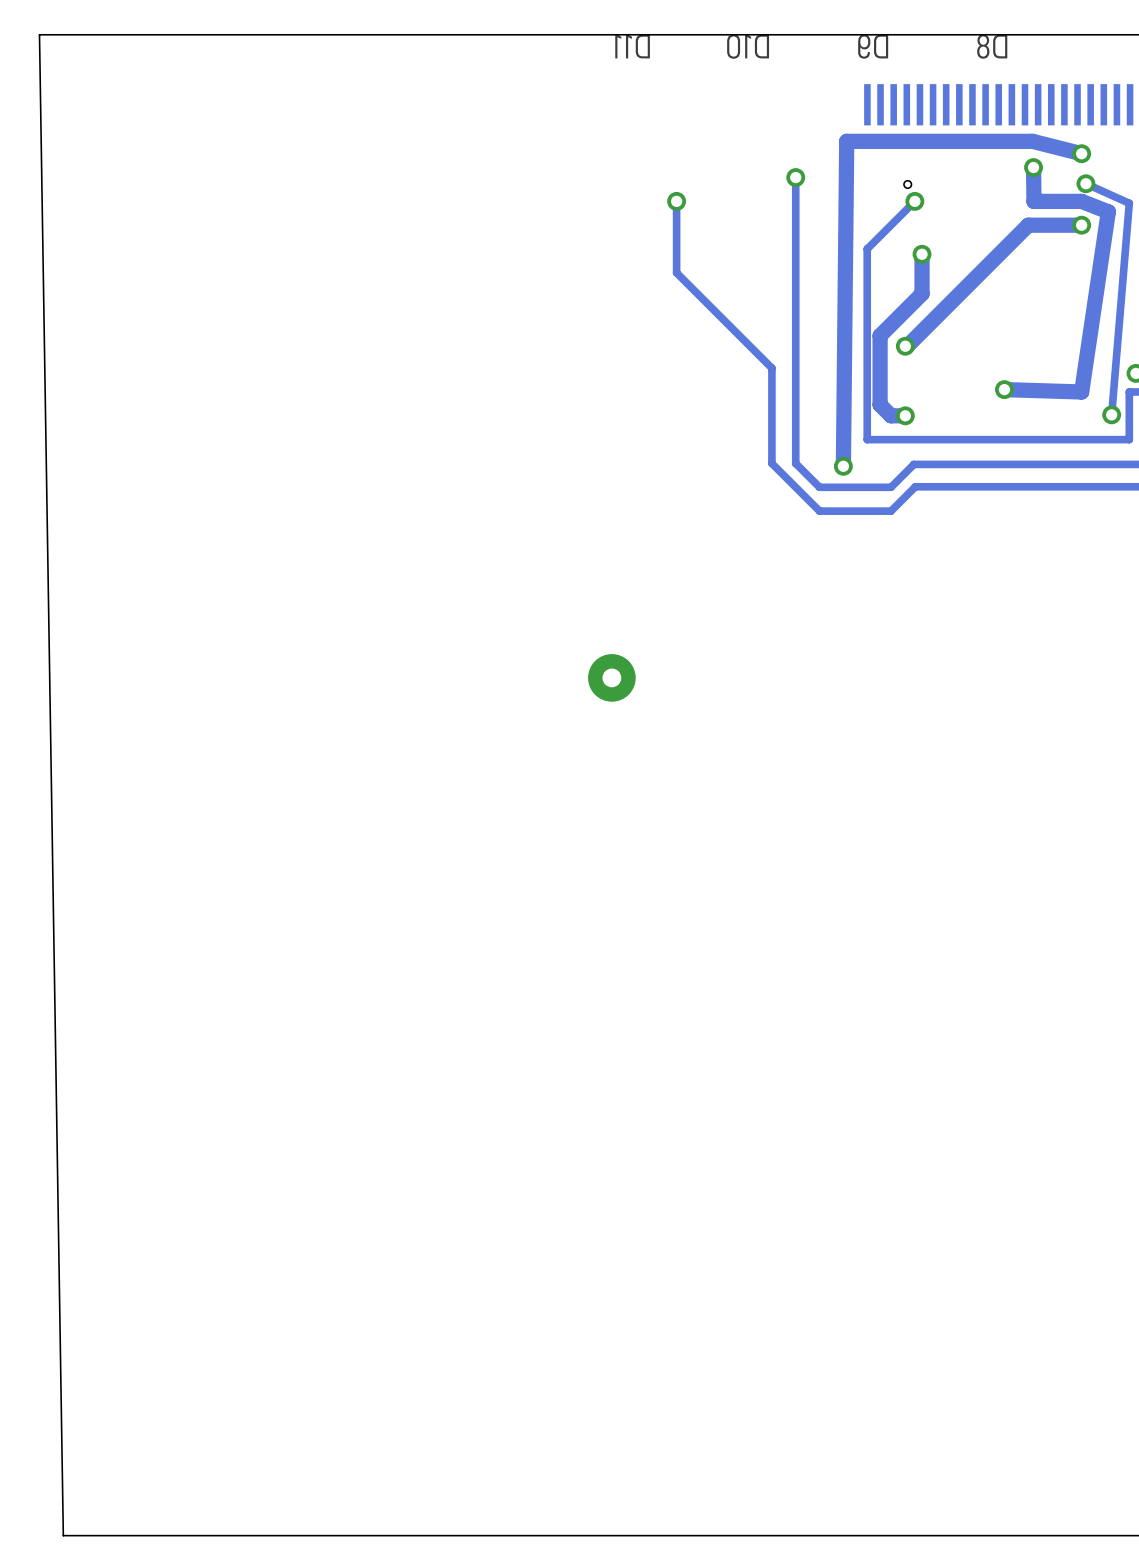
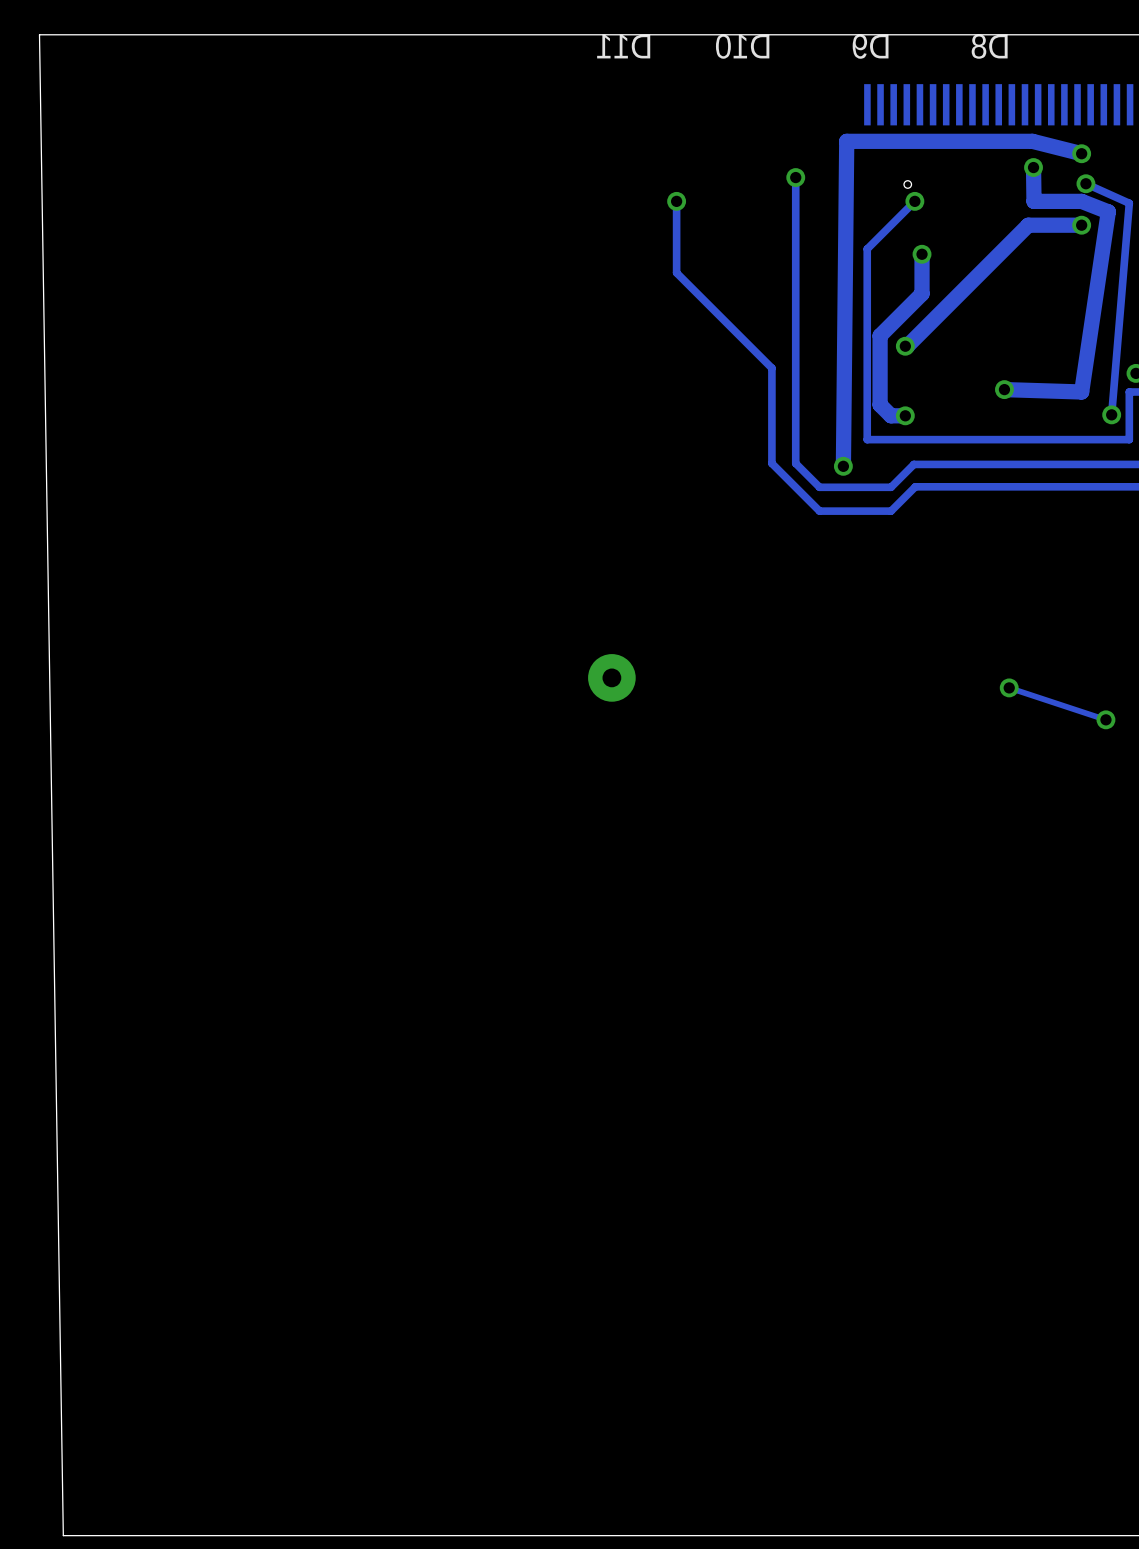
track: none -> (1009, 687) (1105, 719)
via: none -> (1009, 687)
via: none -> (1105, 719)

